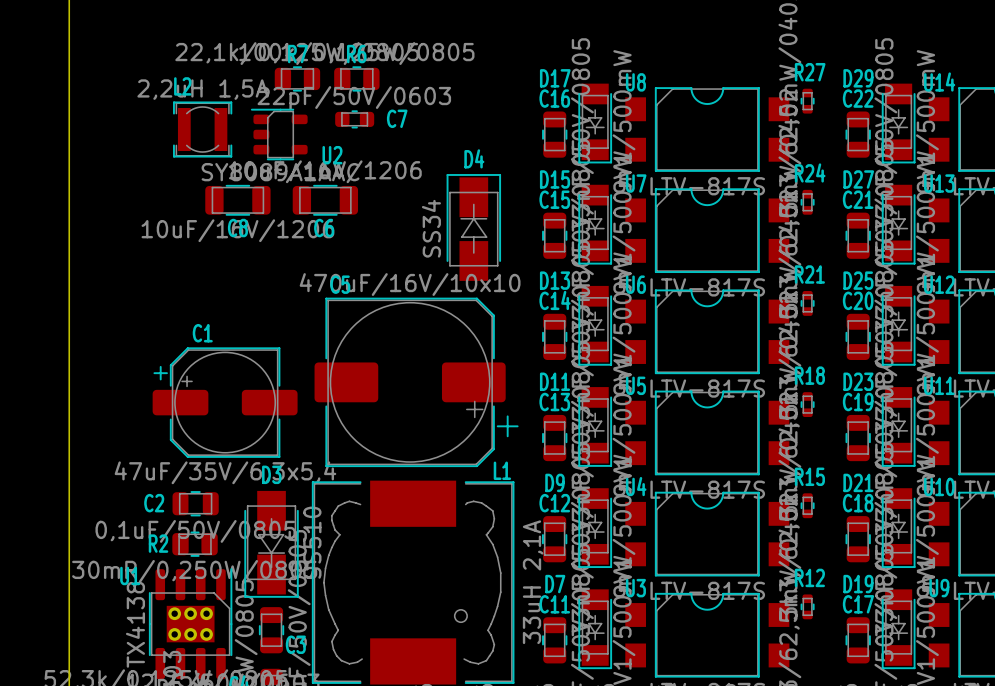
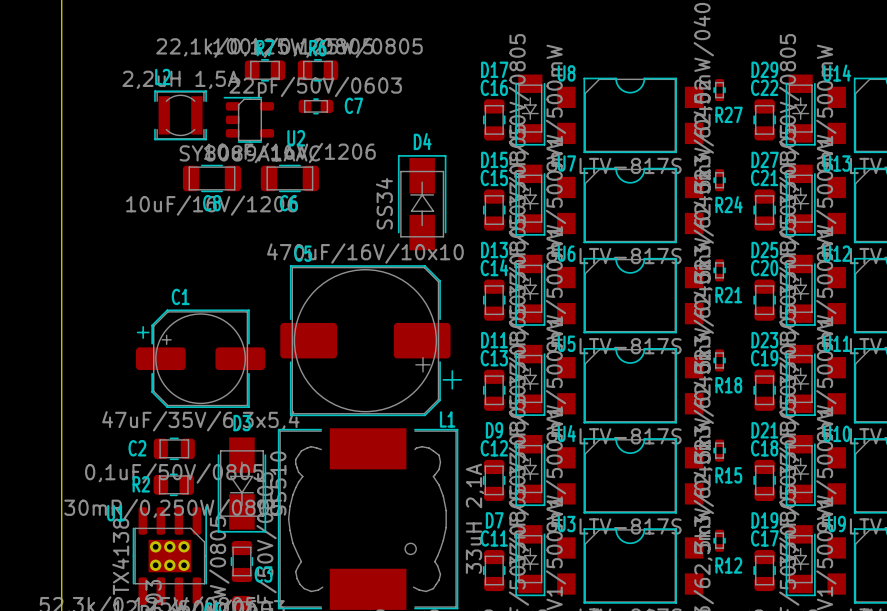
R27 name position: R27 (810, 72) -> R27 (729, 114)
R24 name position: R24 (810, 172) -> R24 (729, 204)
R21 name position: R21 (809, 274) -> R21 (728, 295)
R18 name position: R18 (809, 375) -> R18 (728, 385)
R15 name position: R15 (809, 476) -> R15 (728, 475)
R12 name position: R12 (809, 577) -> R12 (728, 565)

